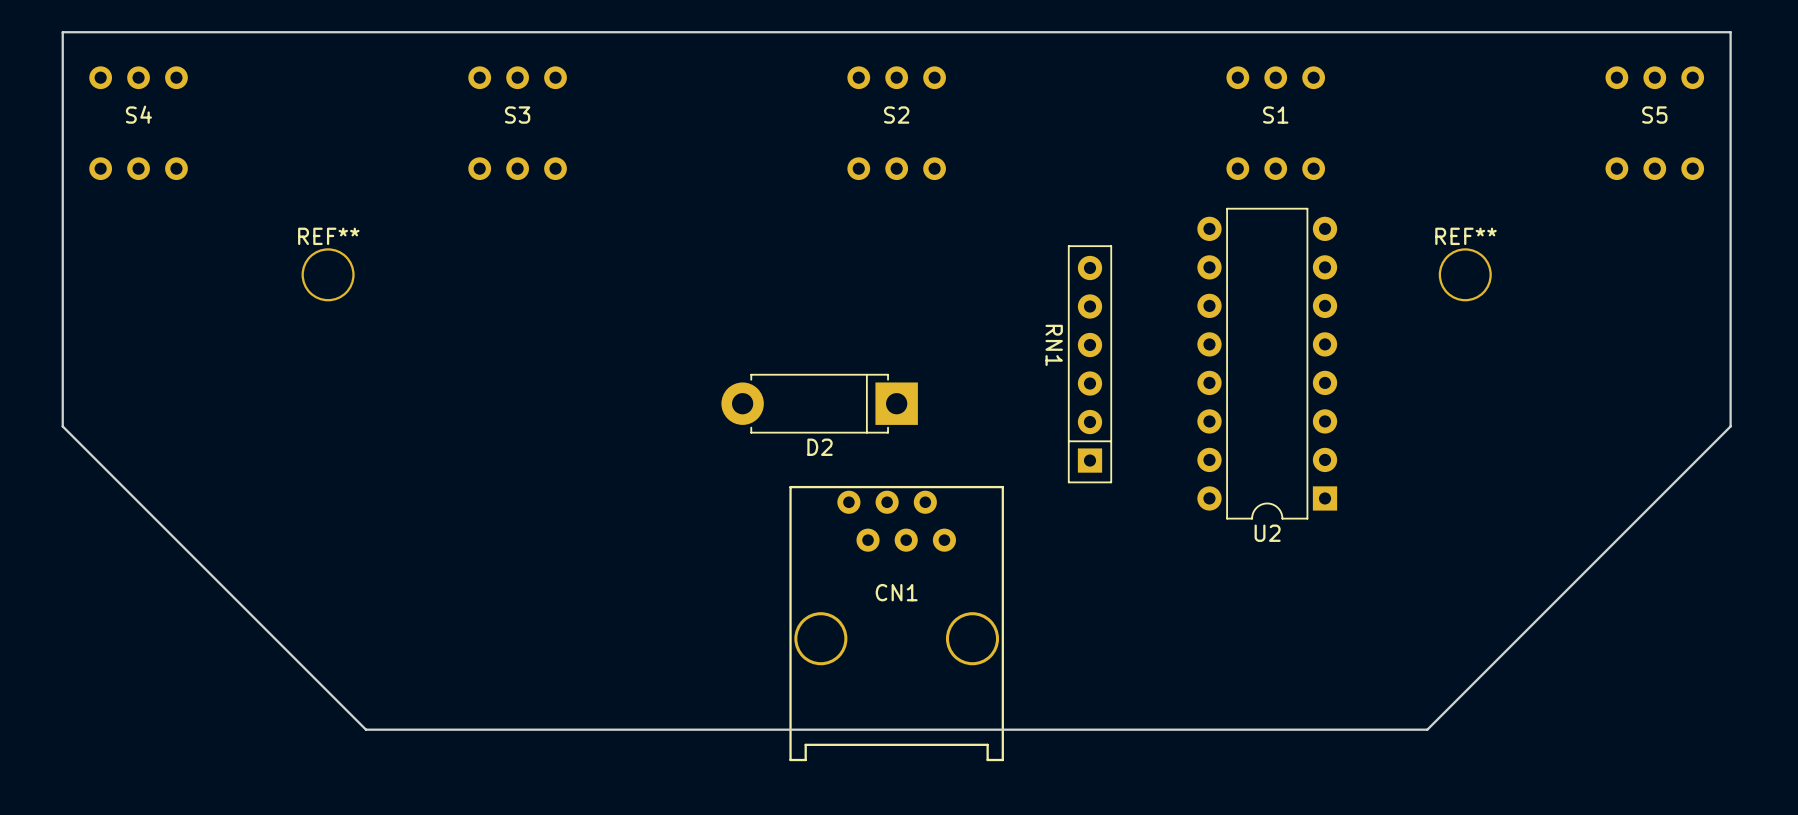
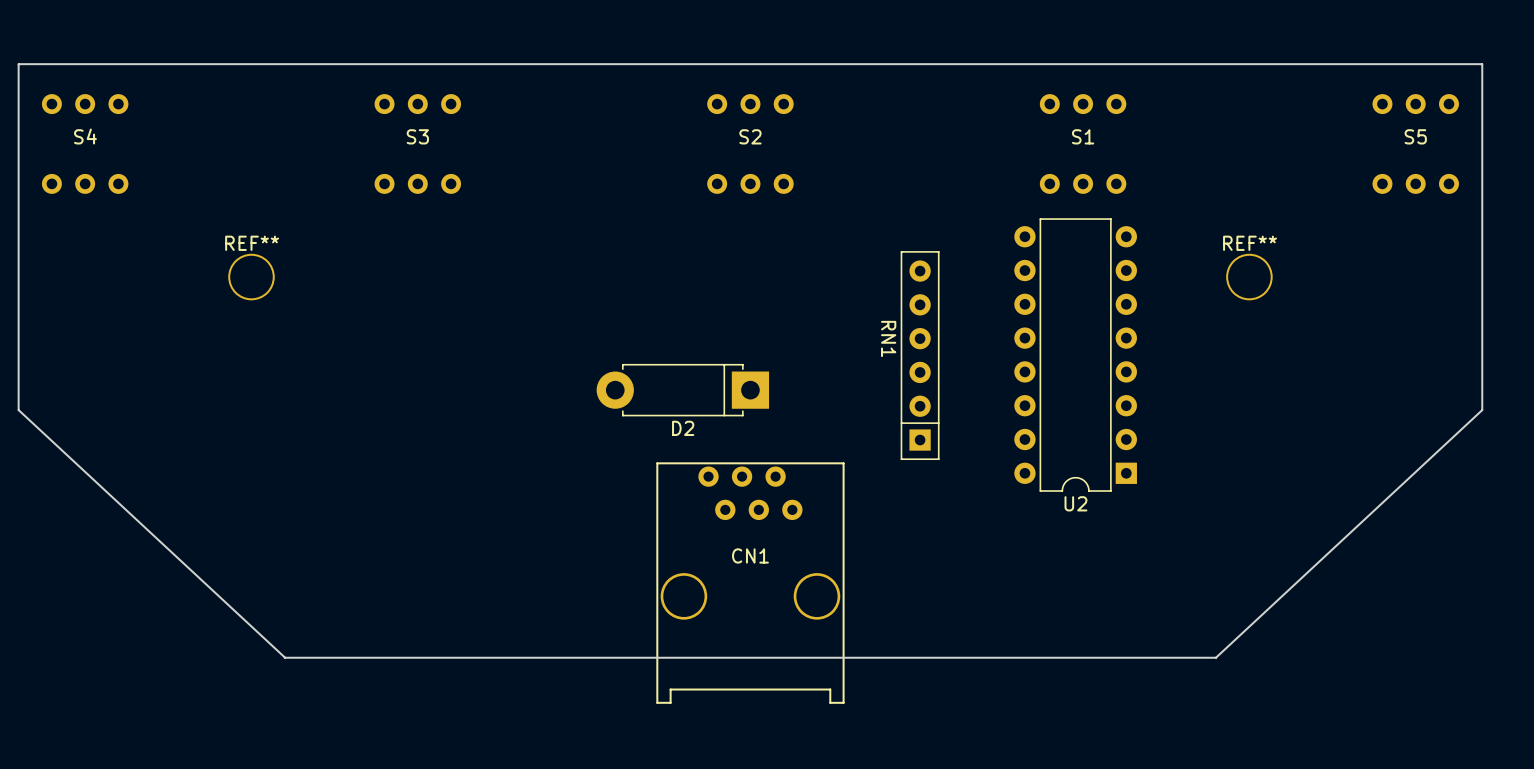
board edge: (1730, 426) (1427, 729) (365, 729) (62, 426) -> (285, 657) (18, 410)
board edge: none -> (1482, 410) (1216, 657)
board edge: none -> (1216, 657) (284, 657)

